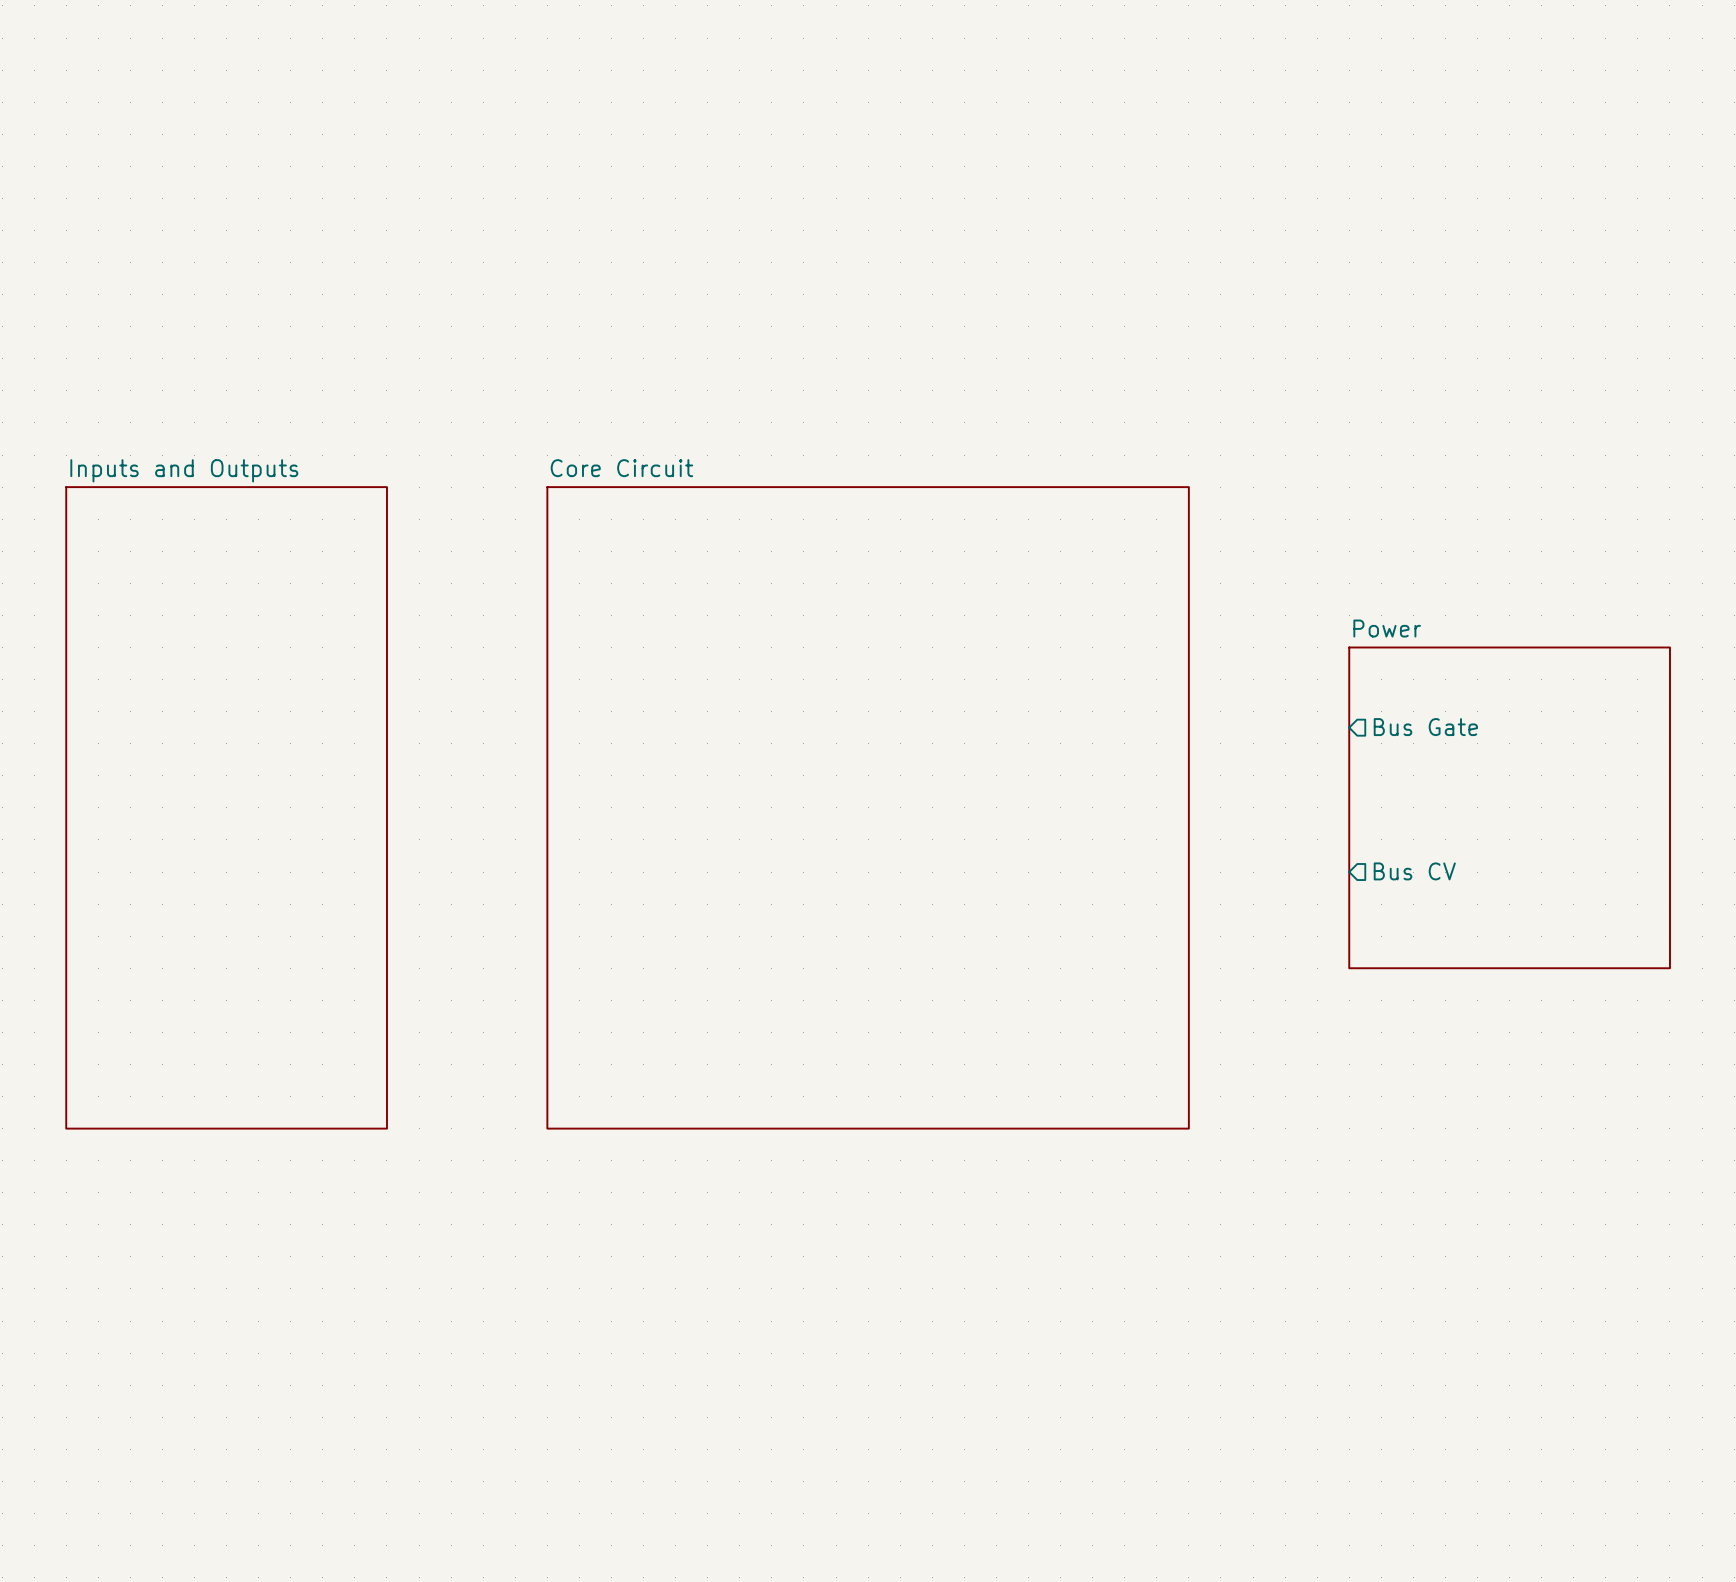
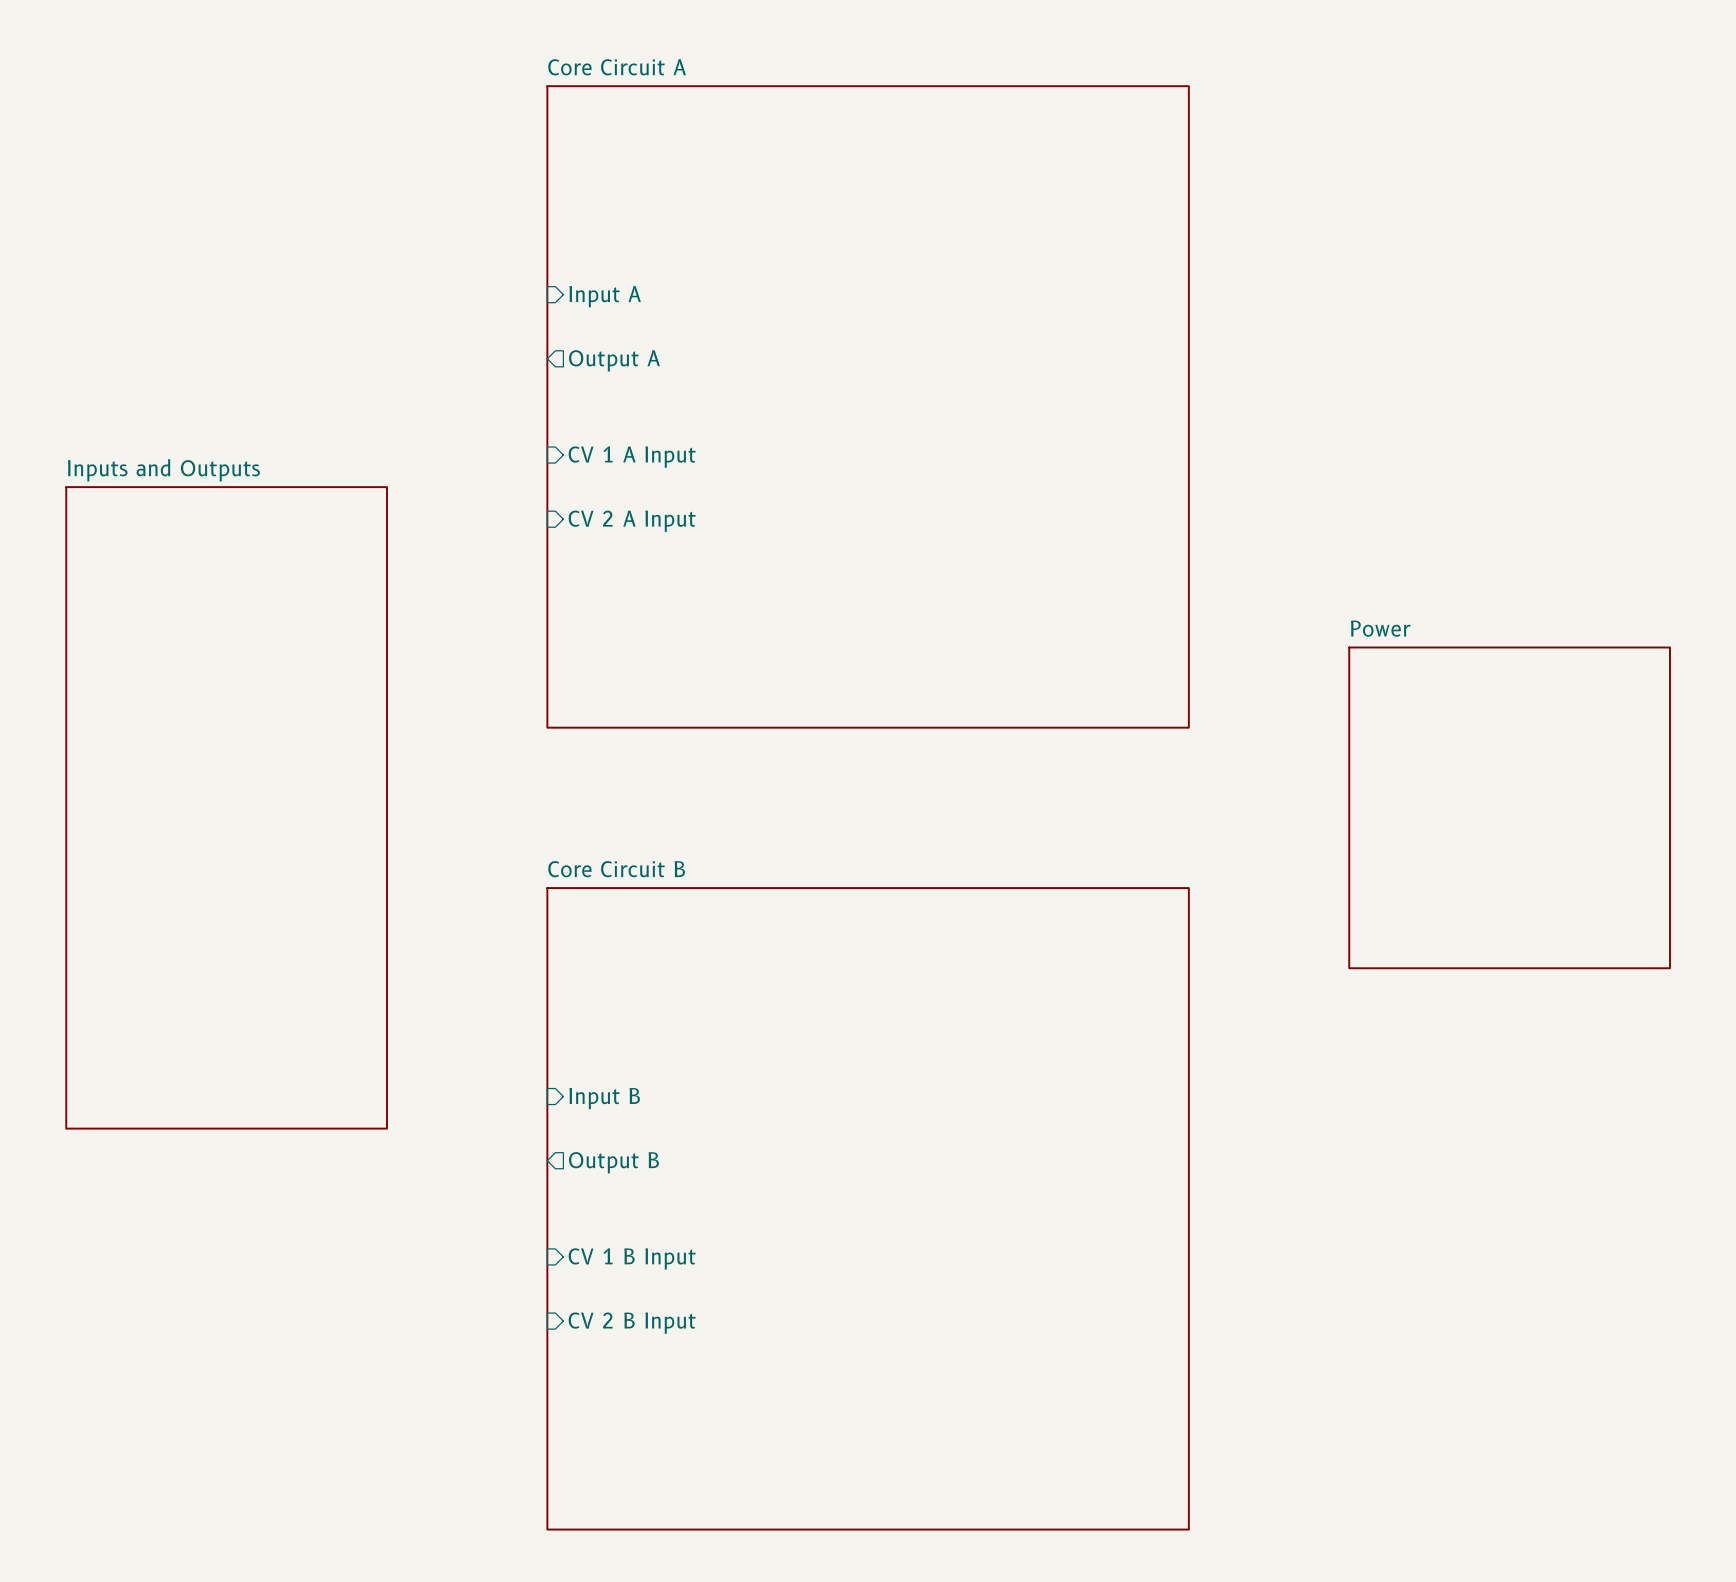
sheet pin: none -> Input A (605, 296)
sheet pin: none -> Output A (614, 360)
sheet Core Circuit A: none -> (868, 406)
sheet pin: none -> CV 1 A Input (632, 457)
sheet pin: none -> CV 2 A Input (632, 521)
sheet pin: Bus Gate (1425, 727) -> none
sheet Core Circuit: (868, 807) -> none
sheet pin: Bus CV (1414, 871) -> none
sheet pin: none -> Input B (604, 1098)
sheet pin: none -> Output B (613, 1162)
sheet Core Circuit B: none -> (868, 1208)
sheet pin: none -> CV 1 B Input (632, 1258)
sheet pin: none -> CV 2 B Input (632, 1323)

